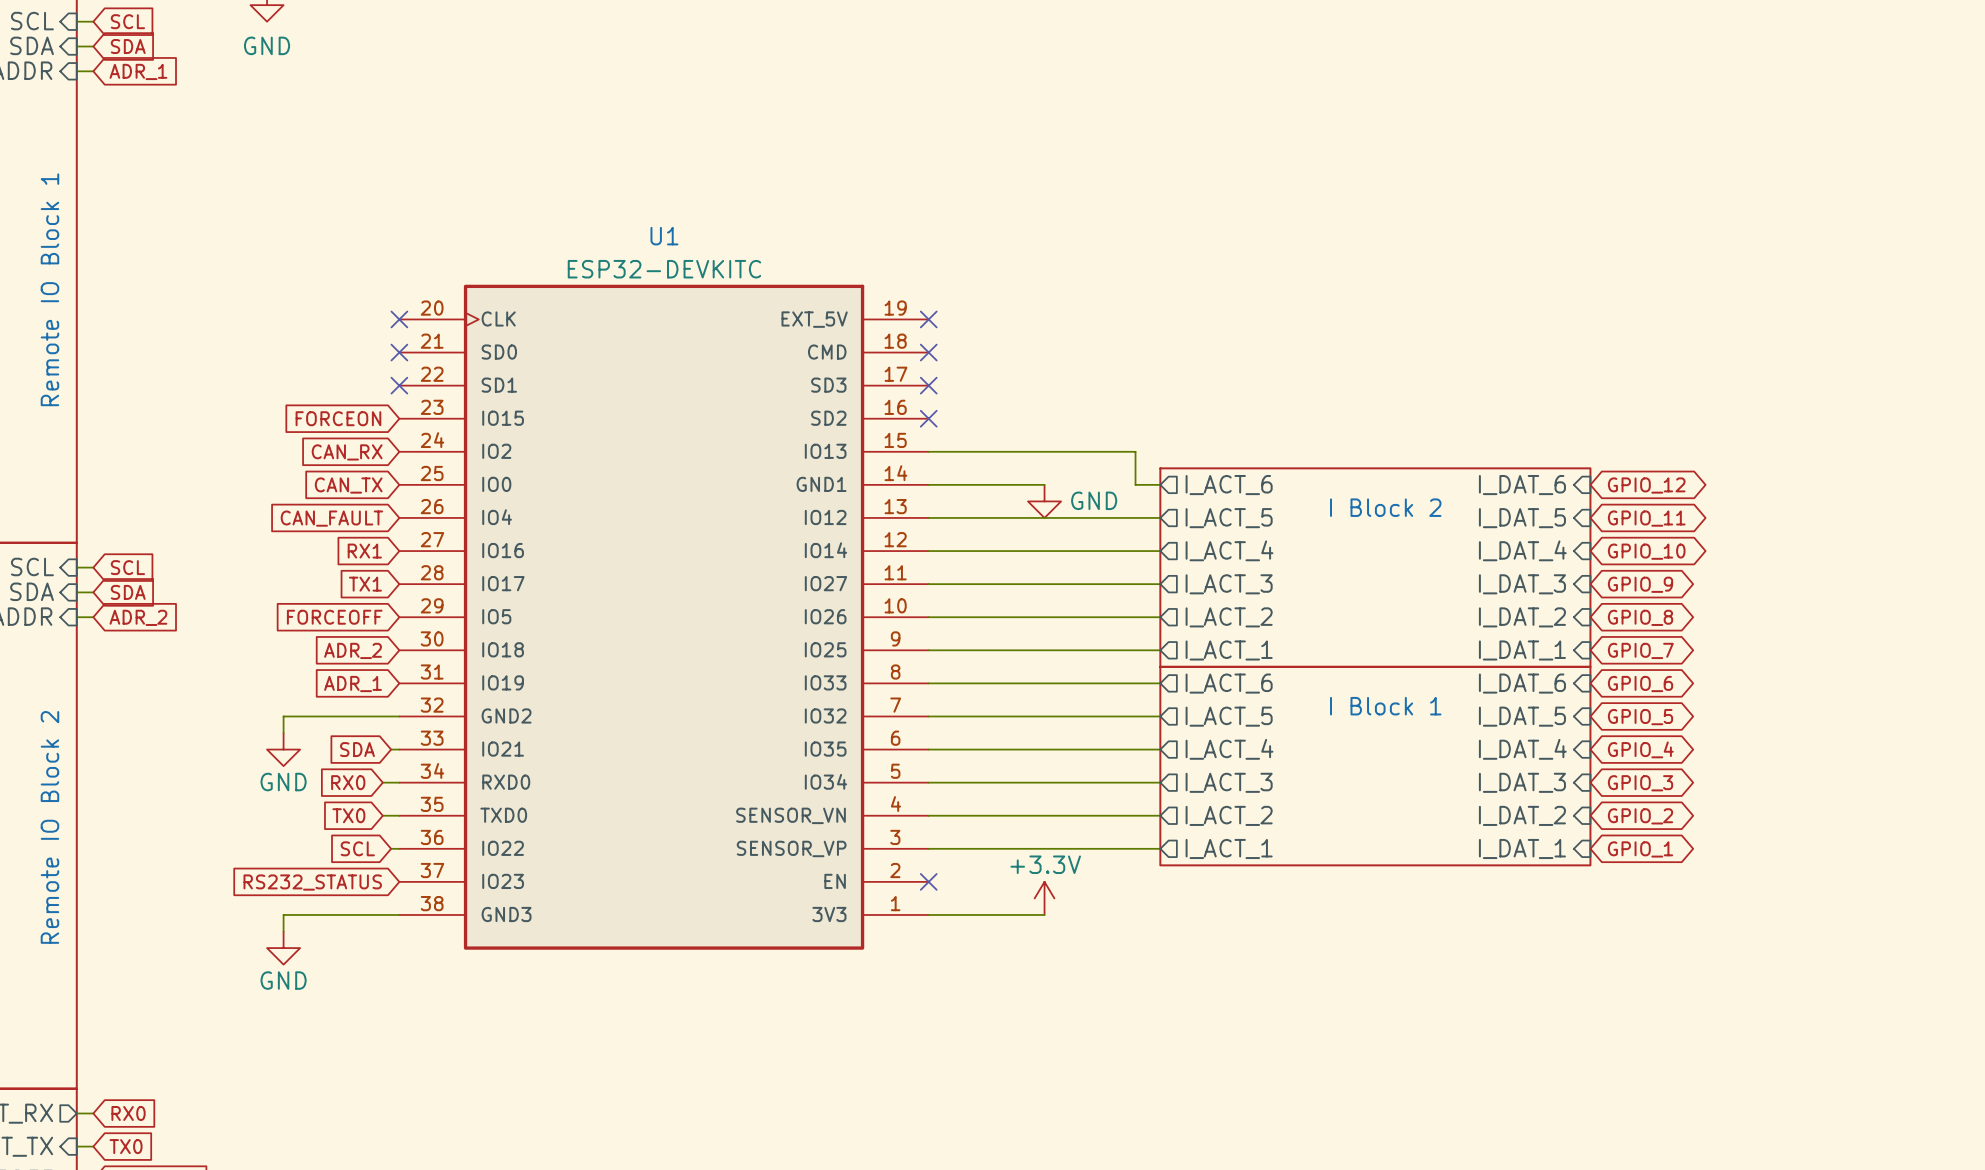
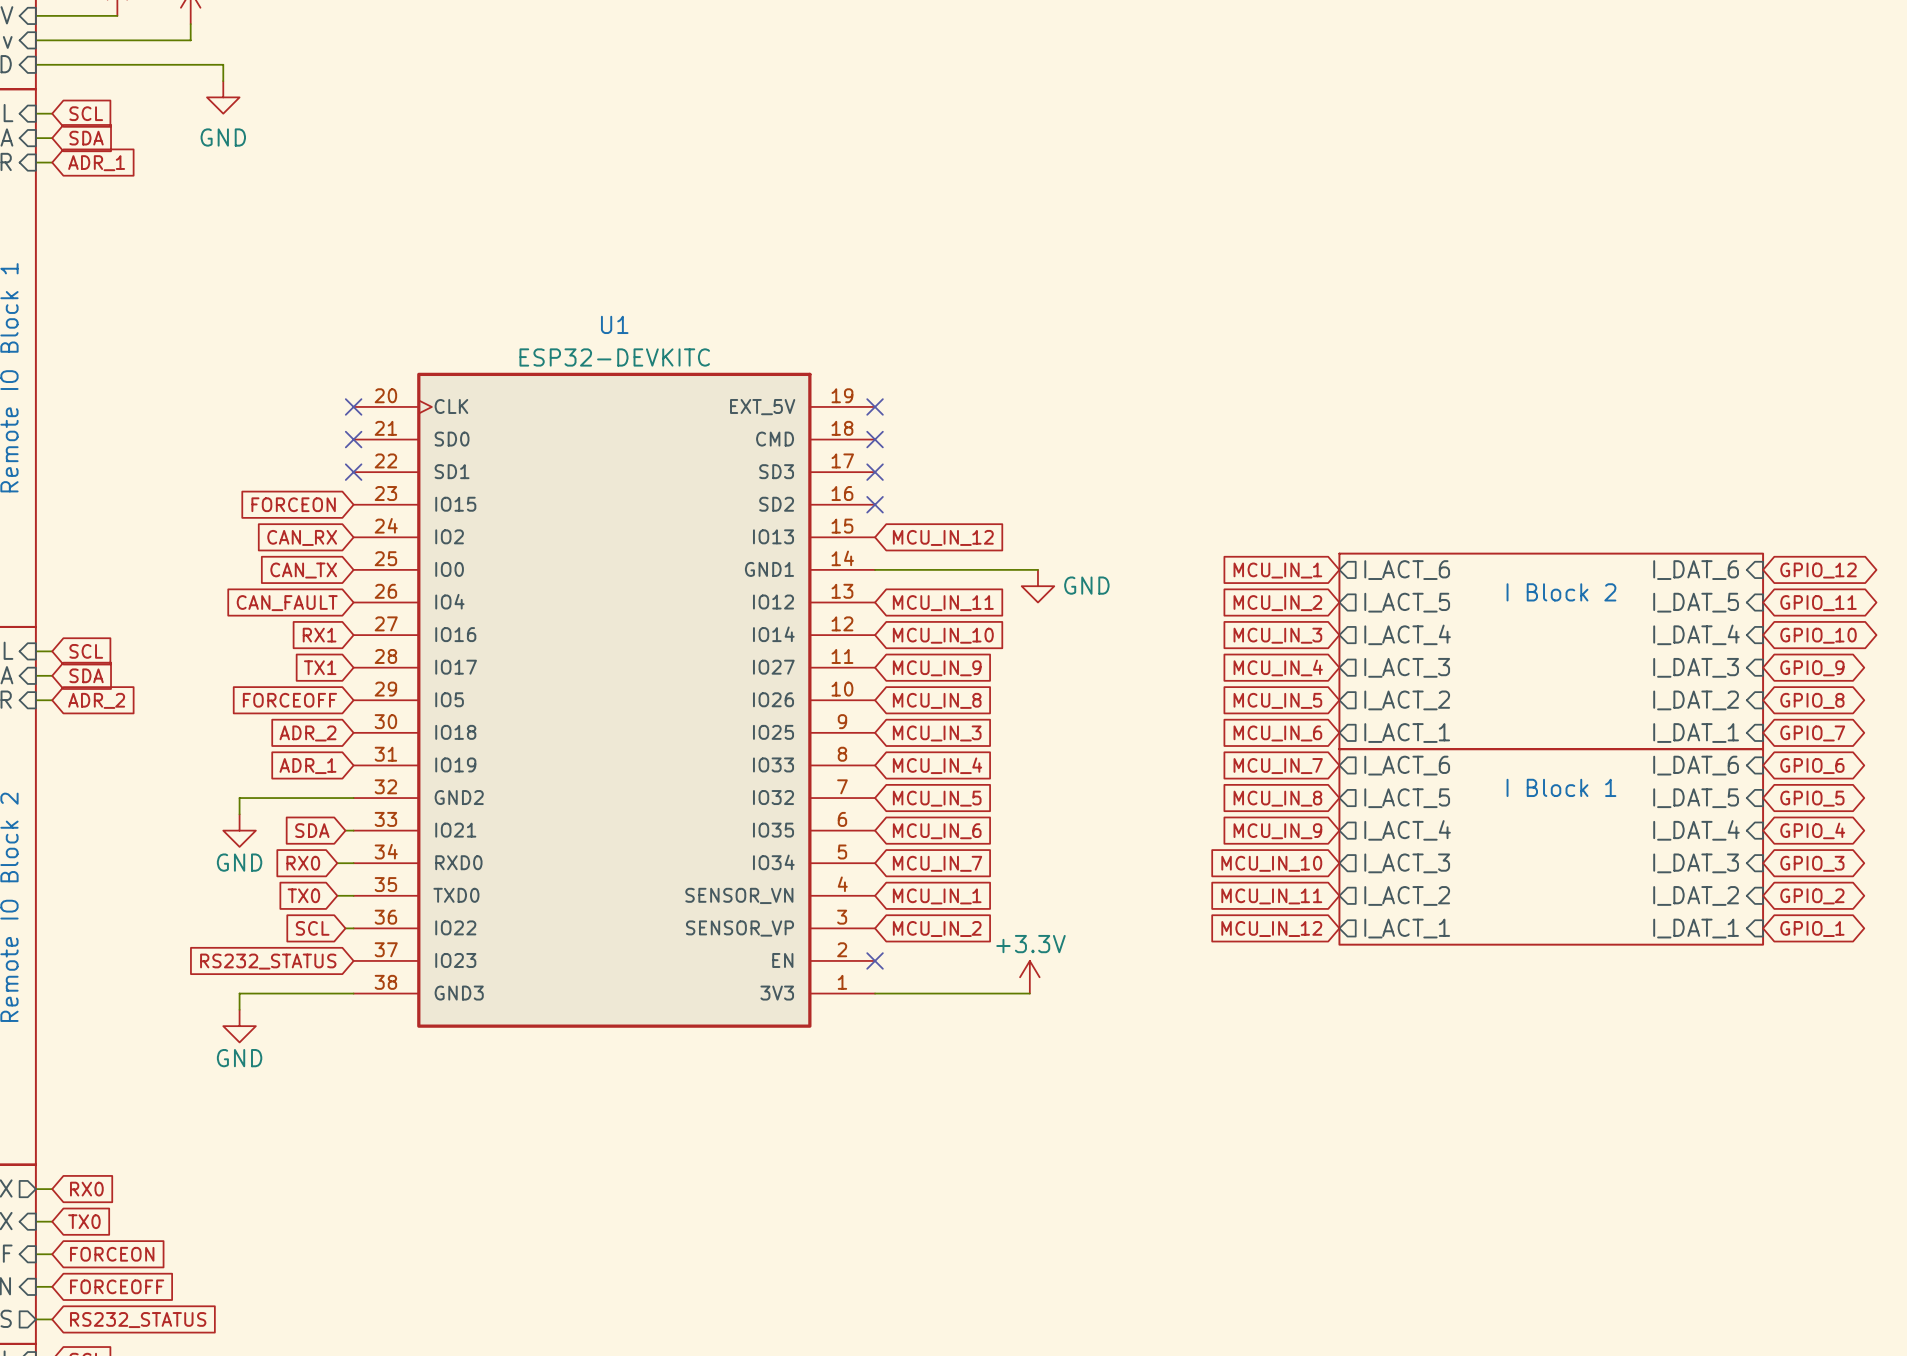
wire: (928, 451) (1135, 451) (1135, 484) (1160, 484) -> none
global label: none -> MCU_IN_12 (943, 537)
wire: none -> (989, 569) (1037, 569)
sheet pin: I_ACT_6 (1229, 485) -> none
global label: none -> MCU_IN_1 (1277, 570)
sheet pin: none -> I_ACT_6 (1407, 570)
sheet pin: I_DAT_6 (1522, 485) -> none
global label position: GPIO_12 (1646, 485) -> GPIO_12 (1818, 570)
sheet pin: none -> I_DAT_6 (1696, 570)
power symbol position: GND (1044, 501) -> GND (1037, 586)
wire: (928, 517) (1160, 517) -> none
global label: none -> MCU_IN_11 (943, 603)
sheet pin: I_ACT_5 (1229, 518) -> none
global label: none -> MCU_IN_2 (1277, 603)
sheet pin: none -> I_ACT_5 (1407, 602)
sheet pin: I_DAT_5 (1522, 518) -> none
global label position: GPIO_11 (1646, 518) -> GPIO_11 (1818, 603)
sheet pin: none -> I_DAT_5 (1696, 602)
sheet pin: I_ACT_4 (1229, 550) -> none
sheet pin: none -> I_ACT_4 (1407, 634)
sheet pin: I_DAT_4 (1522, 550) -> none
sheet pin: none -> I_DAT_4 (1696, 634)
wire: (928, 551) (1160, 551) -> none
global label: none -> MCU_IN_10 (943, 635)
global label: none -> MCU_IN_3 (1277, 635)
global label position: GPIO_10 (1646, 551) -> GPIO_10 (1818, 635)
sheet I Block 2 position: (1375, 567) -> (1551, 651)
wire: (928, 584) (1160, 584) -> none
global label: none -> MCU_IN_9 (937, 668)
sheet pin: I_ACT_3 (1229, 584) -> none
global label: none -> MCU_IN_4 (1278, 667)
sheet pin: none -> I_ACT_3 (1407, 667)
sheet pin: I_DAT_3 (1522, 584) -> none
global label position: GPIO_9 (1640, 584) -> GPIO_9 (1812, 668)
sheet pin: none -> I_DAT_3 (1696, 667)
wire: (928, 617) (1160, 617) -> none
global label: none -> MCU_IN_8 (937, 700)
sheet pin: I_ACT_2 (1229, 617) -> none
global label: none -> MCU_IN_5 (1277, 700)
sheet pin: none -> I_ACT_2 (1407, 700)
sheet pin: I_DAT_2 (1522, 617) -> none
global label position: GPIO_8 (1640, 617) -> GPIO_8 (1812, 700)
sheet pin: none -> I_DAT_2 (1696, 700)
wire: (928, 650) (1160, 650) -> none
global label: none -> MCU_IN_3 (937, 733)
sheet pin: I_ACT_1 (1229, 650) -> none
global label: none -> MCU_IN_6 (1277, 733)
sheet pin: none -> I_ACT_1 (1407, 733)
sheet pin: I_DAT_1 (1522, 650) -> none
global label position: GPIO_7 (1640, 650) -> GPIO_7 (1812, 733)
sheet pin: none -> I_DAT_1 (1696, 733)
wire: (928, 683) (1160, 683) -> none
global label: none -> MCU_IN_4 (937, 765)
sheet pin: I_ACT_6 (1229, 683) -> none
sheet pin: none -> I_ACT_6 (1407, 765)
sheet pin: I_DAT_6 (1522, 683) -> none
sheet pin: none -> I_DAT_6 (1696, 765)
global label: none -> MCU_IN_7 (1278, 766)
global label position: GPIO_6 (1640, 684) -> GPIO_6 (1812, 766)
wire: (928, 716) (1160, 716) -> none
sheet pin: I_ACT_5 (1229, 716) -> none
sheet pin: none -> I_ACT_5 (1407, 798)
sheet pin: I_DAT_5 (1522, 716) -> none
sheet pin: none -> I_DAT_5 (1696, 798)
global label: none -> MCU_IN_5 (937, 798)
global label: none -> MCU_IN_8 (1277, 798)
global label position: GPIO_5 (1640, 717) -> GPIO_5 (1812, 798)
wire: (928, 749) (1160, 749) -> none
sheet pin: I_ACT_4 (1229, 749) -> none
sheet pin: none -> I_ACT_4 (1407, 830)
sheet pin: I_DAT_4 (1522, 749) -> none
global label position: GPIO_4 (1640, 749) -> GPIO_4 (1812, 830)
sheet pin: none -> I_DAT_4 (1696, 830)
global label: none -> MCU_IN_6 (937, 831)
global label: none -> MCU_IN_9 (1277, 831)
sheet I Block 1 position: (1375, 766) -> (1551, 846)
wire: (928, 782) (1160, 782) -> none
sheet pin: I_ACT_3 (1229, 782) -> none
sheet pin: none -> I_ACT_3 (1407, 863)
sheet pin: I_DAT_3 (1522, 782) -> none
sheet pin: none -> I_DAT_3 (1696, 863)
global label: none -> MCU_IN_7 (937, 863)
global label: none -> MCU_IN_10 (1271, 863)
global label position: GPIO_3 (1640, 783) -> GPIO_3 (1812, 863)
wire: (928, 815) (1160, 815) -> none
sheet pin: I_ACT_2 (1229, 815) -> none
sheet pin: none -> I_ACT_2 (1407, 895)
sheet pin: I_DAT_2 (1522, 815) -> none
sheet pin: none -> I_DAT_2 (1696, 895)
global label: none -> MCU_IN_1 (937, 896)
global label: none -> MCU_IN_11 (1271, 896)
global label position: GPIO_2 (1640, 816) -> GPIO_2 (1812, 896)
wire: (928, 848) (1160, 848) -> none
sheet pin: I_ACT_1 (1229, 848) -> none
sheet pin: none -> I_ACT_1 (1407, 928)
sheet pin: I_DAT_1 (1522, 848) -> none
sheet pin: none -> I_DAT_1 (1696, 928)
global label: none -> MCU_IN_2 (937, 928)
global label: none -> MCU_IN_12 (1271, 928)
global label position: GPIO_1 (1640, 849) -> GPIO_1 (1812, 928)
power symbol position: +3.3V (1044, 898) -> +3.3V (1029, 977)
wire: none -> (989, 993) (1029, 993)

